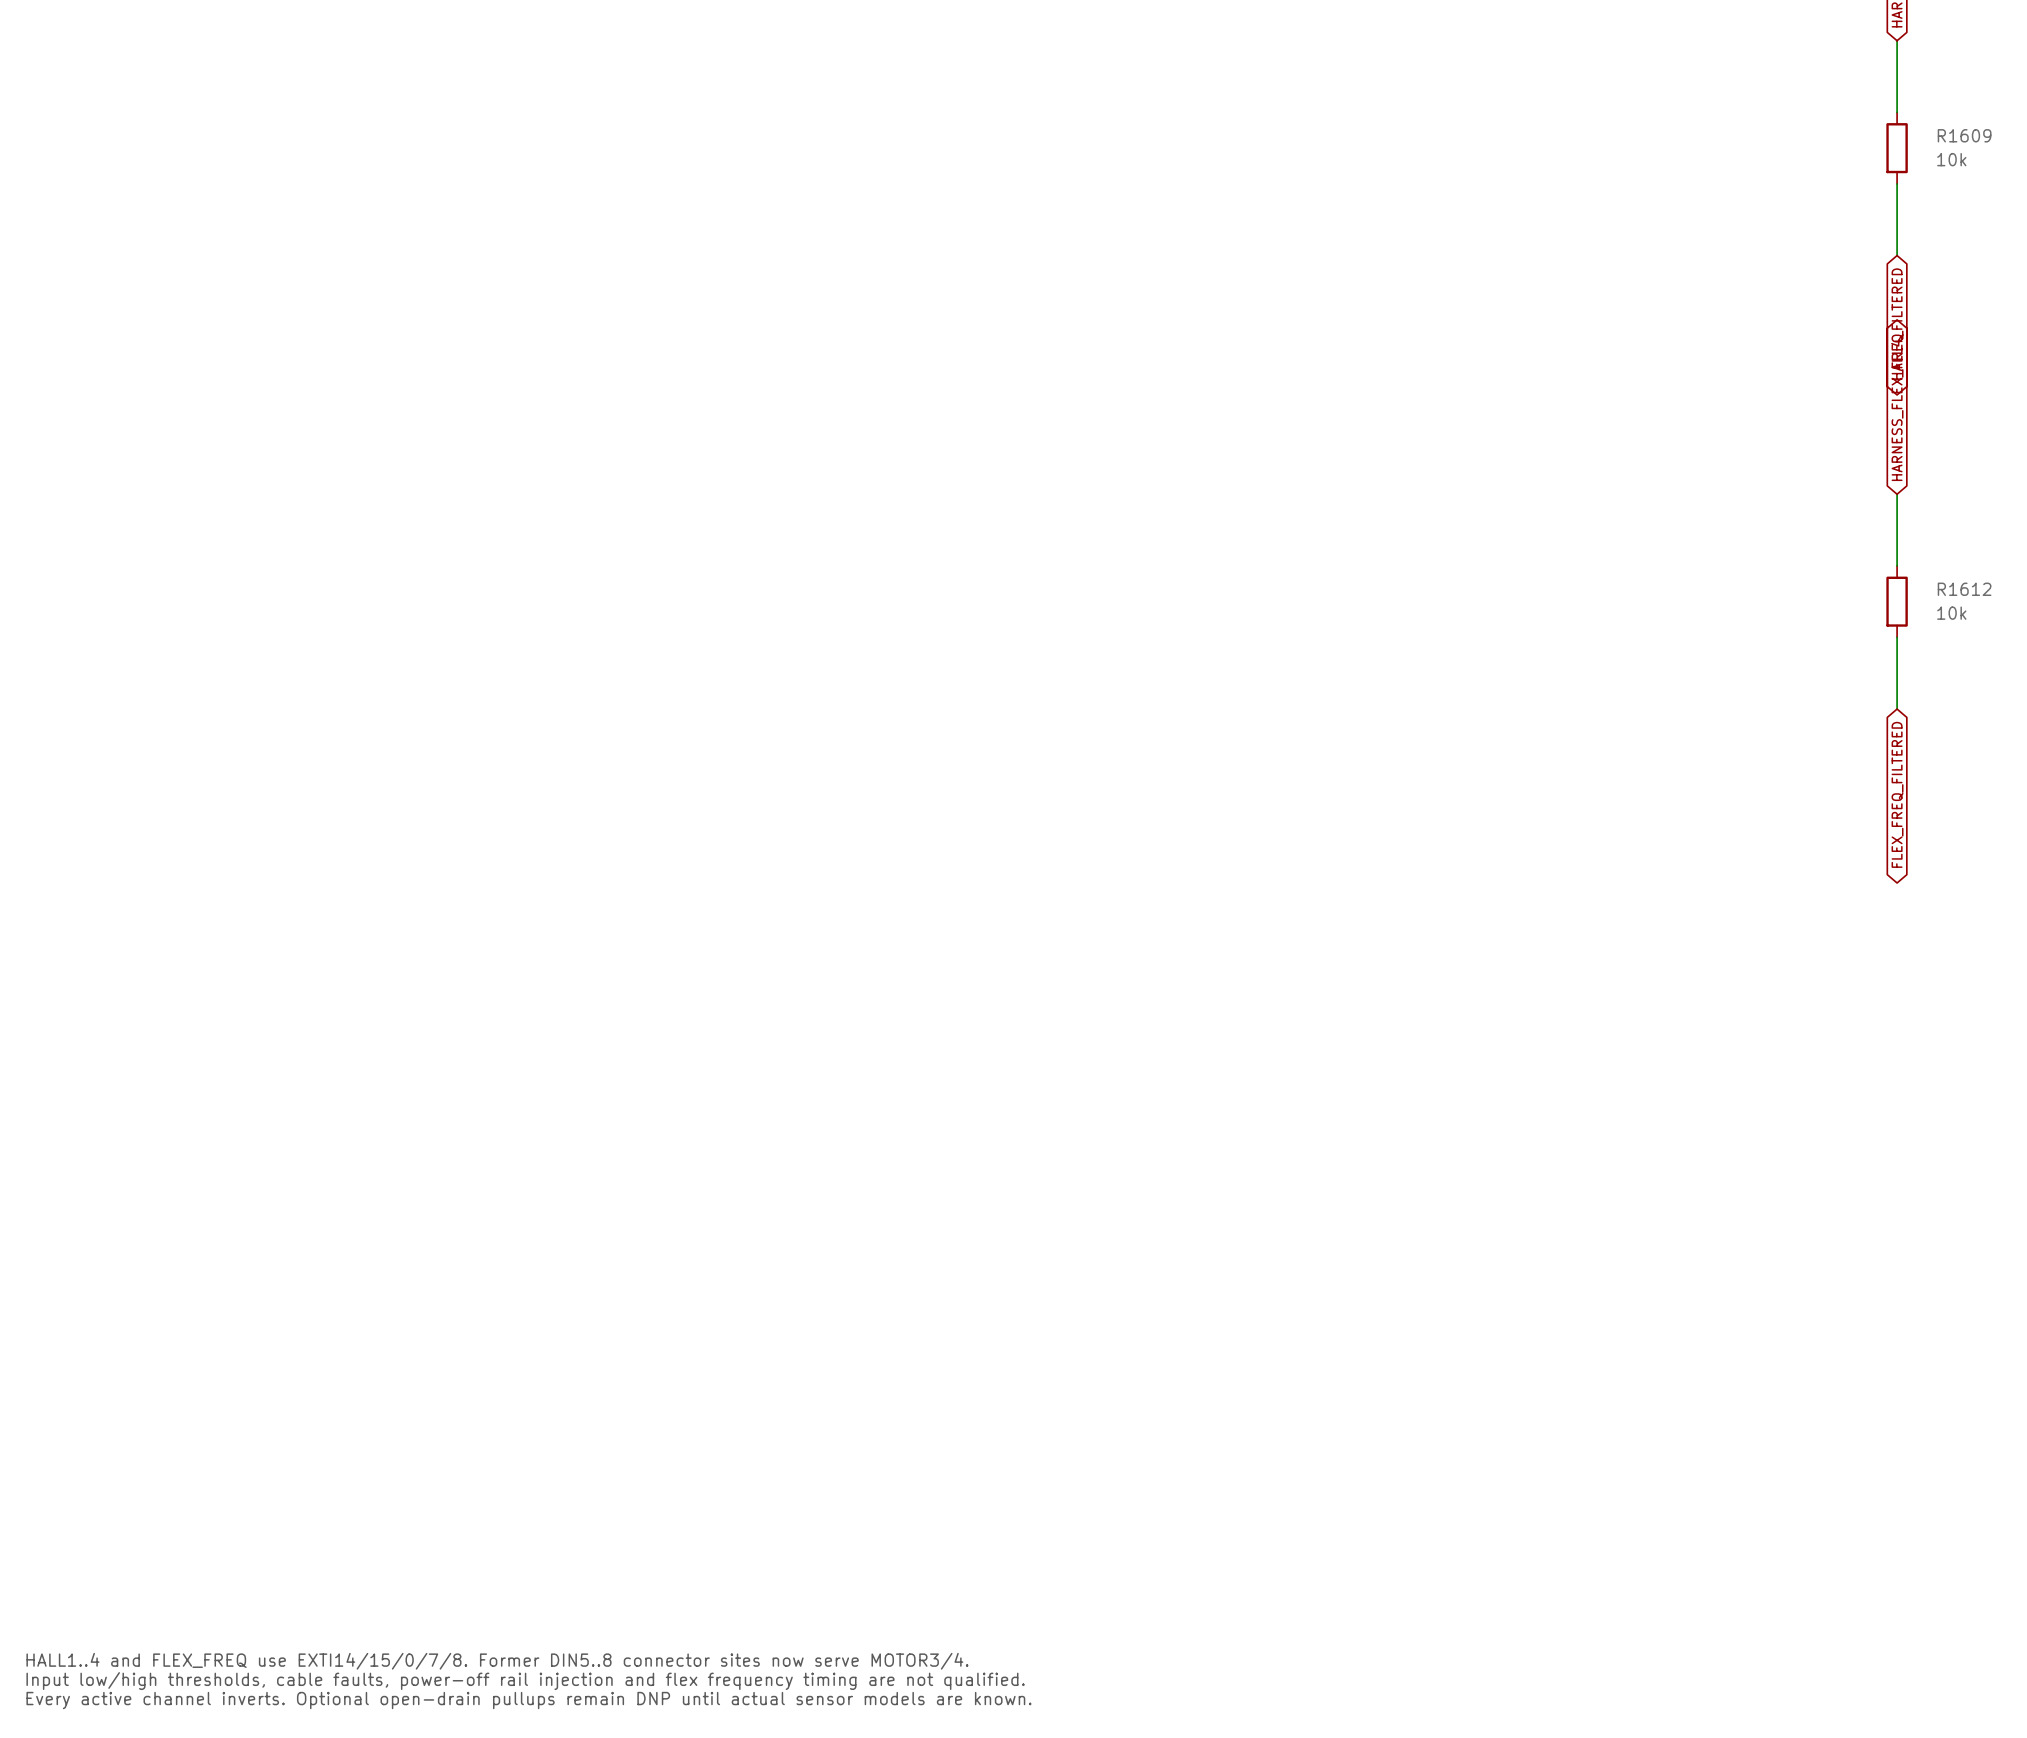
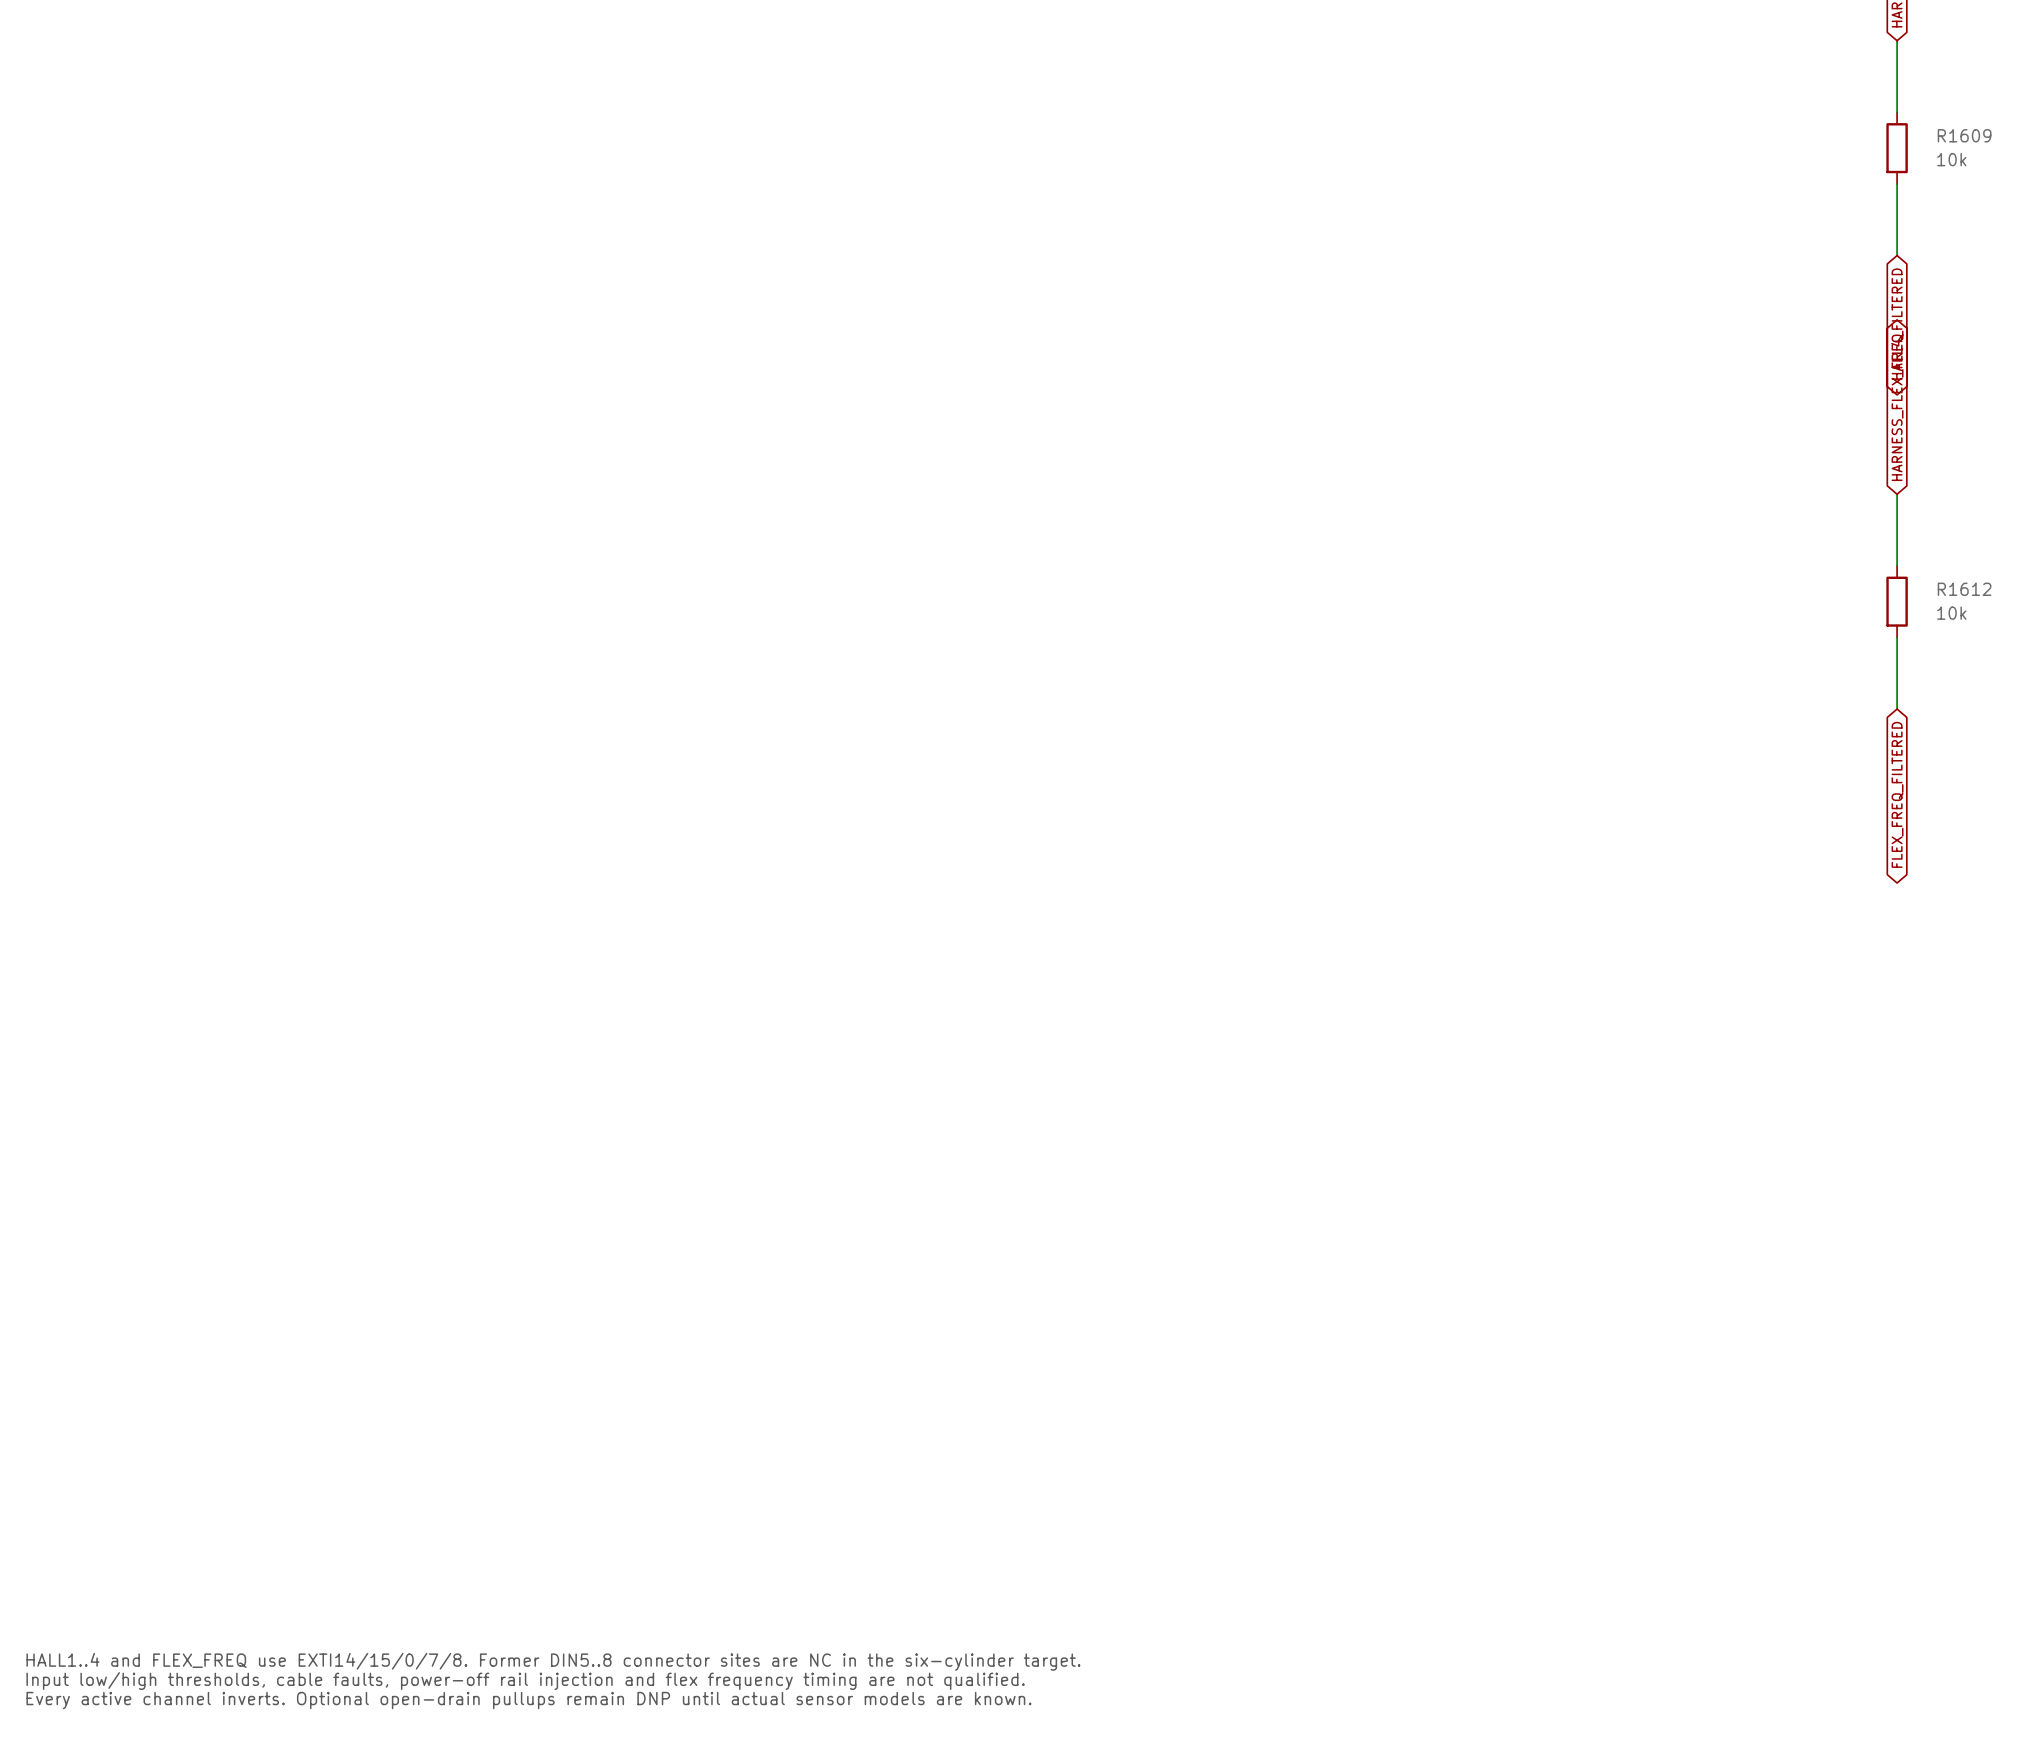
text: HALL1..4 and FLEX_FREQ use EXTI14/15/0/7/8. Former DIN5..8 connector sites now serve MOTOR3/4. (497, 1661) -> HALL1..4 and FLEX_FREQ use EXTI14/15/0/7/8. Former DIN5..8 connector sites are NC in the six-cylinder target. (553, 1661)

